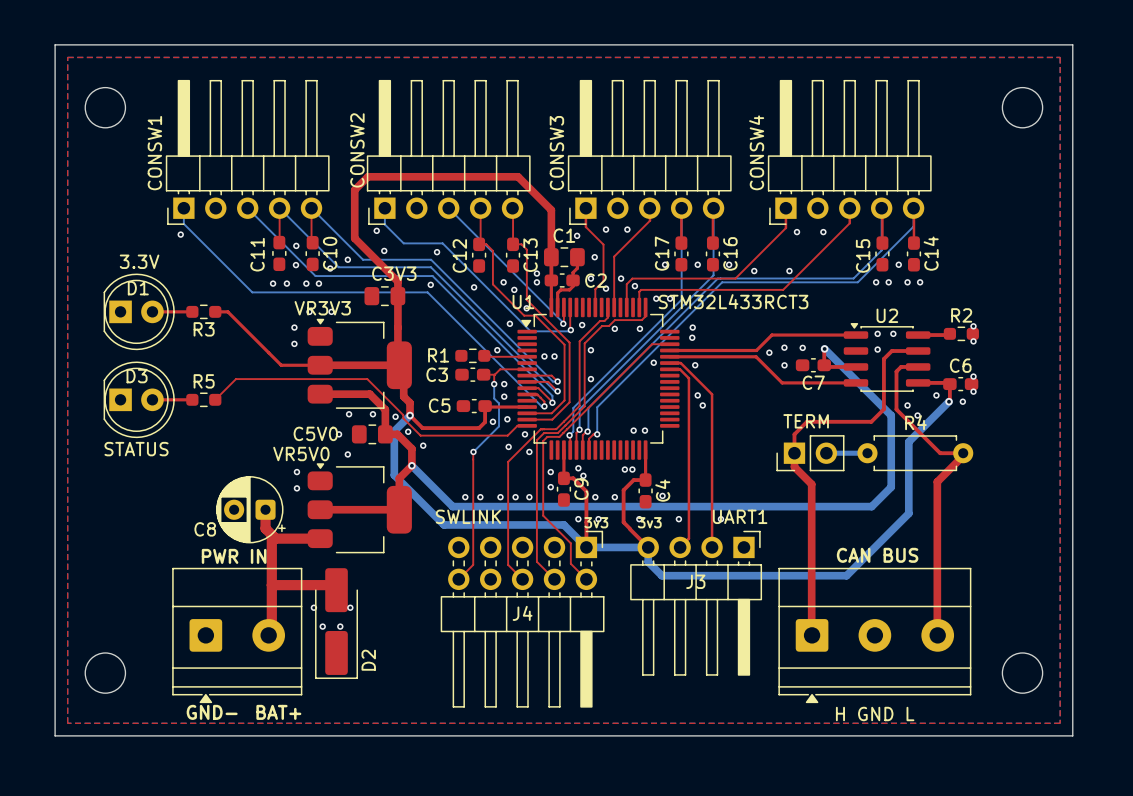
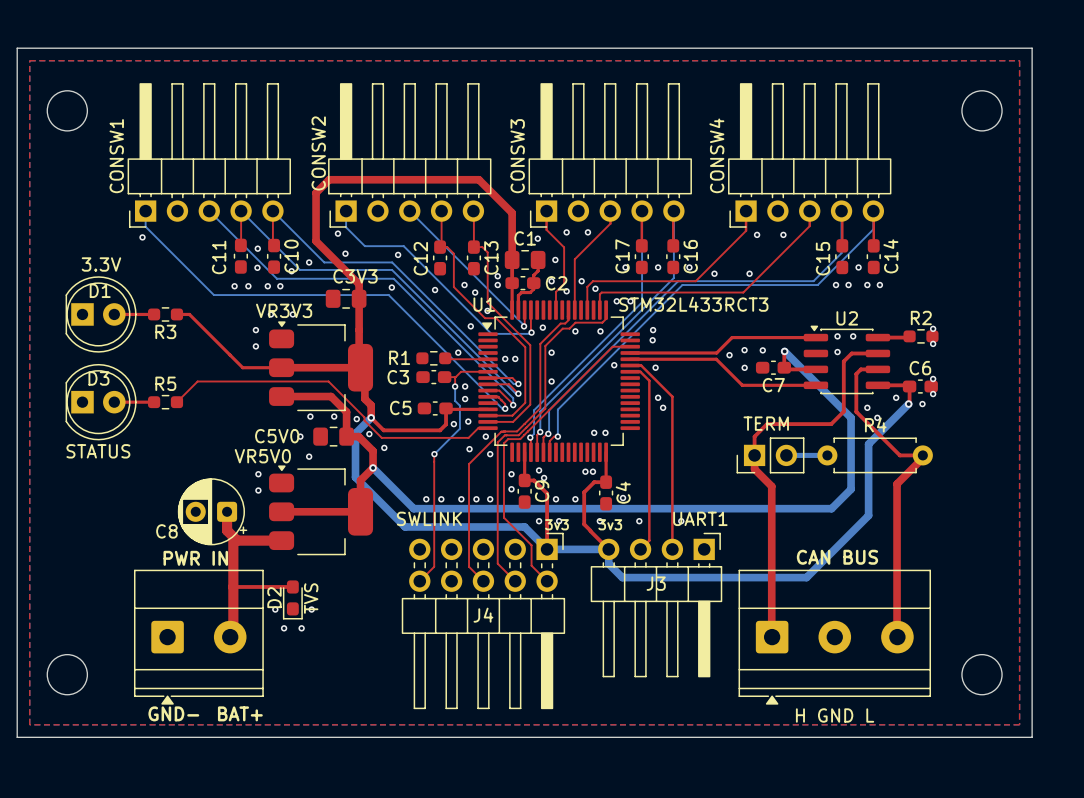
D2 footprint: [315, 568, 359, 679] -> [282, 580, 303, 620]
top track width: thick (271, 585) (331, 585) -> thin (233, 586) (292, 586)
D2 value: none -> TVS (311, 598)
D2 name position: D2 (368, 660) -> D2 (274, 597)

